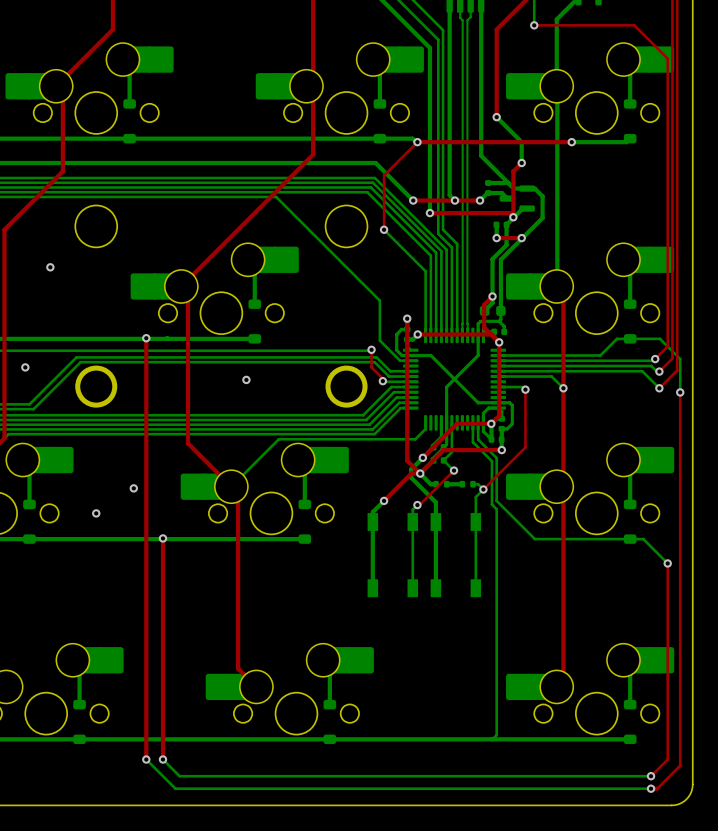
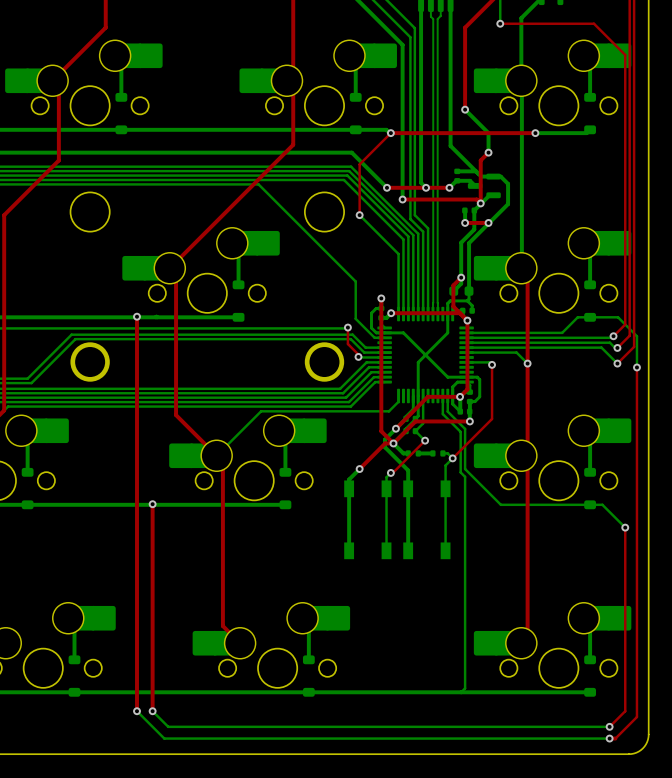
via: (50, 267) -> none
via: (25, 367) -> none
via: (246, 379) -> none
via: (133, 488) -> none
via: (96, 513) -> none

